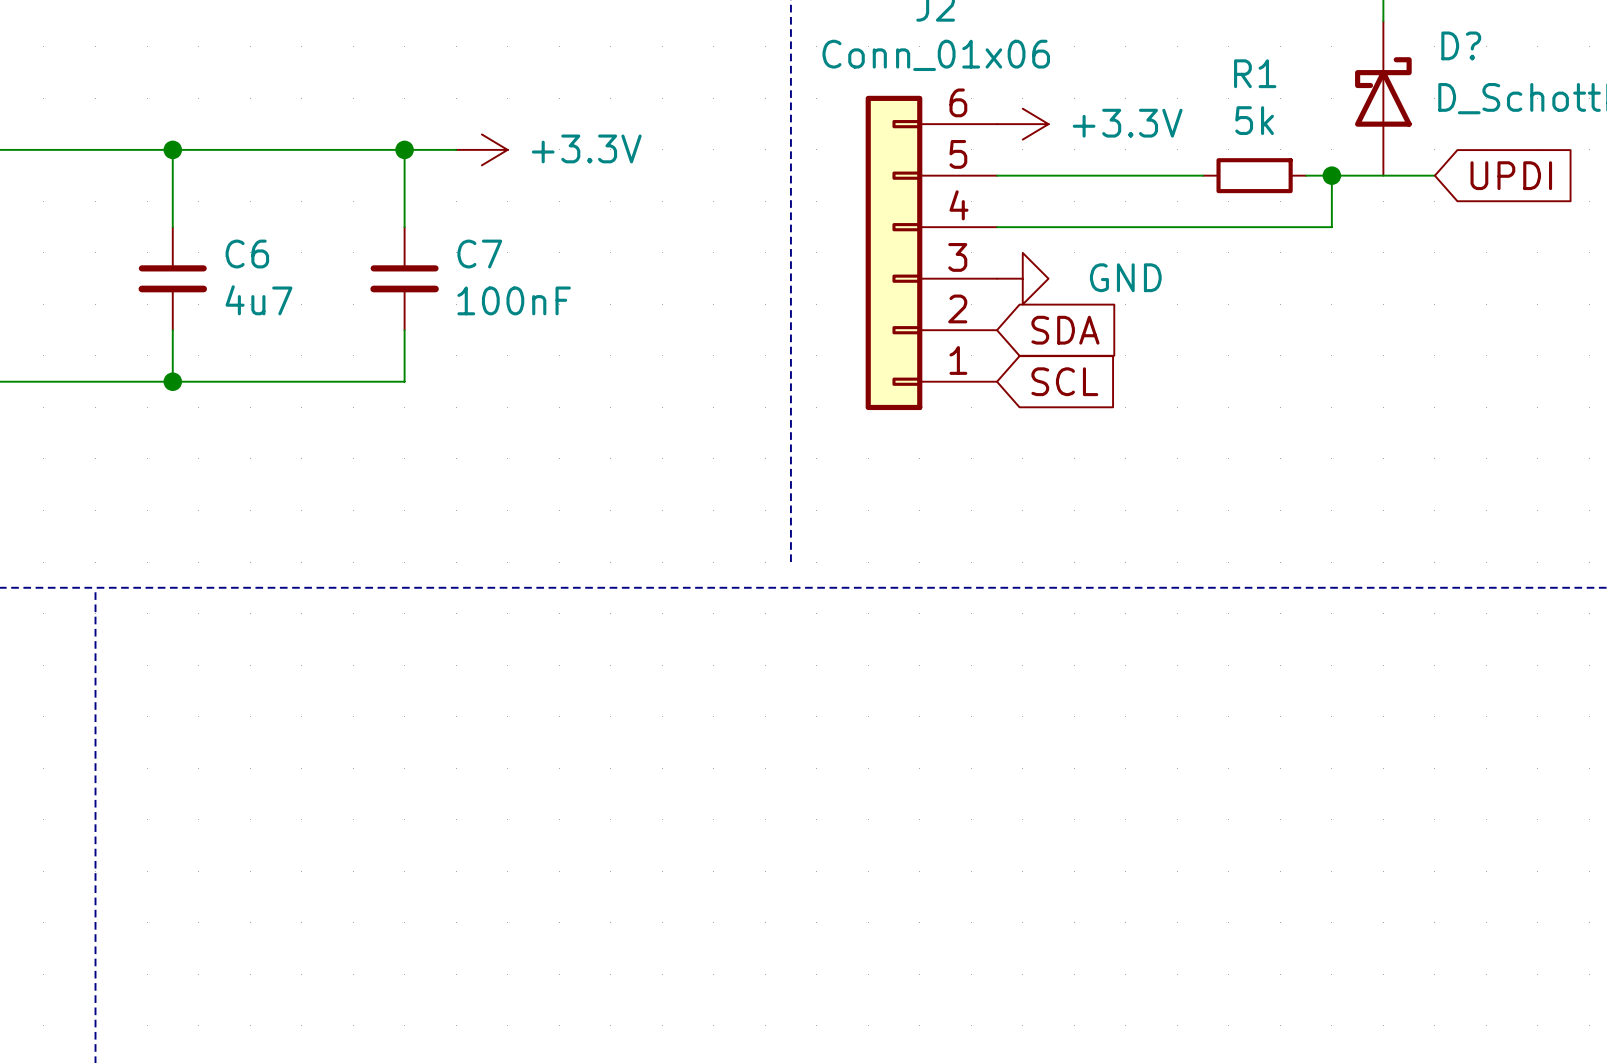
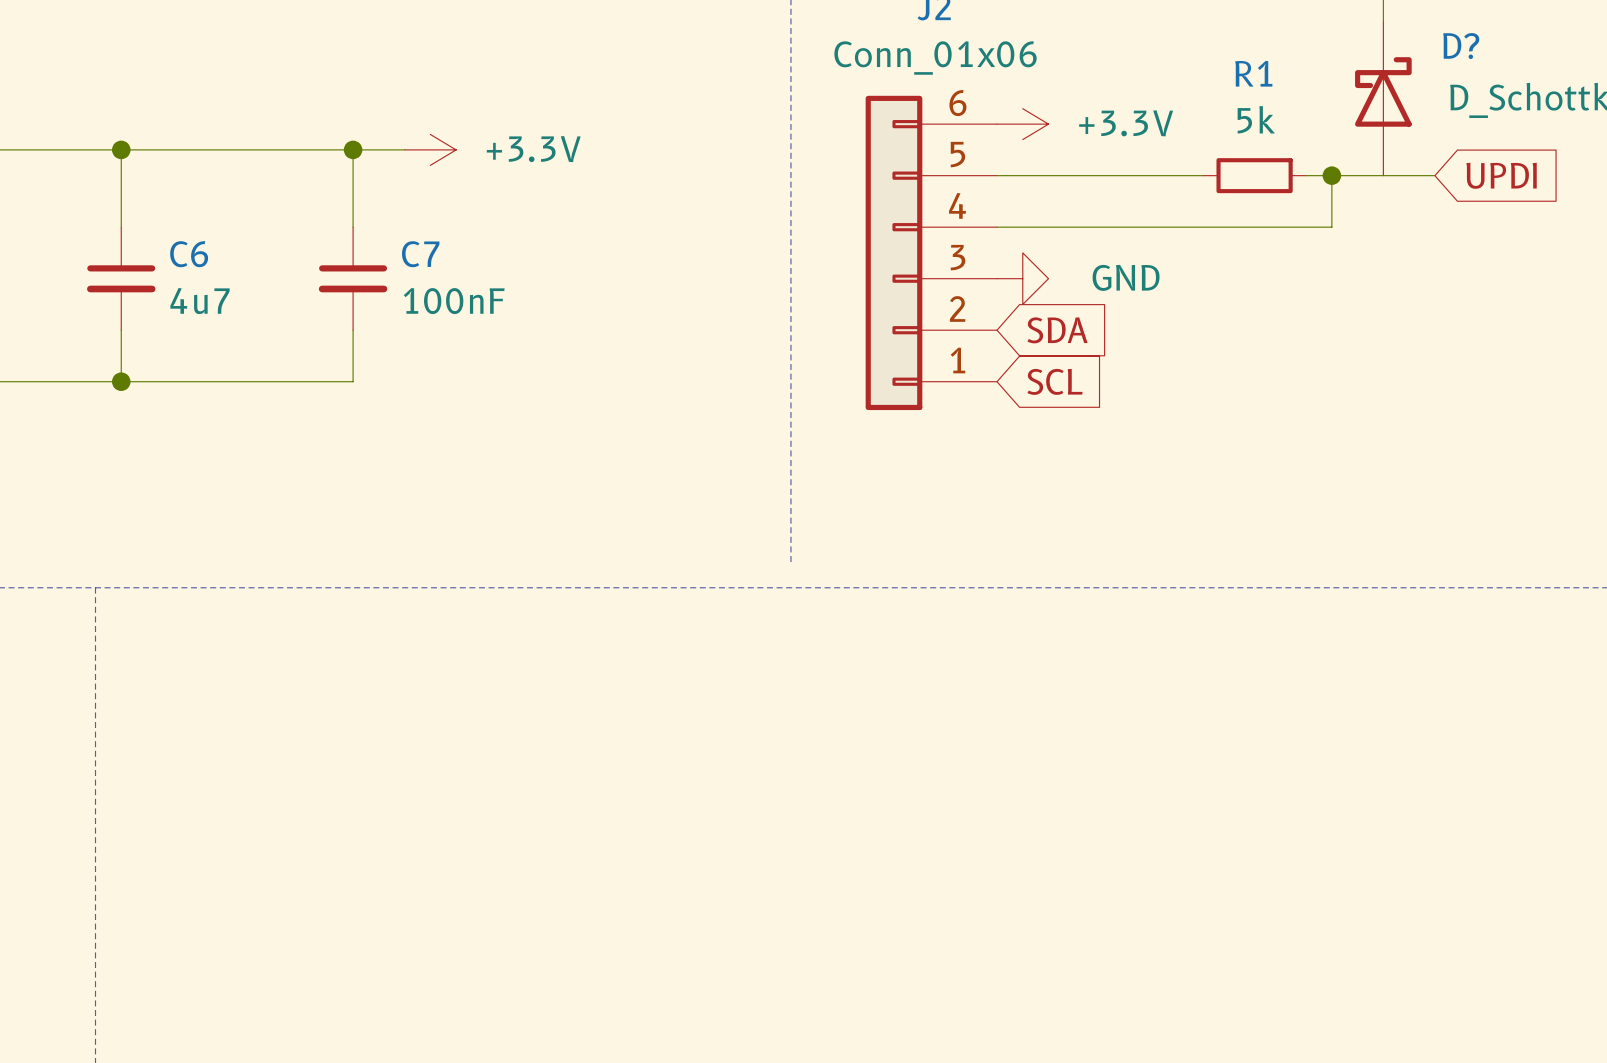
wire: (172, 149) (172, 227) -> (121, 149) (121, 227)
junction position: (172, 149) -> (121, 149)
wire: none -> (353, 149) (353, 227)
junction position: (404, 149) -> (353, 149)
wire: (456, 149) (404, 149) (404, 227) -> none
power symbol position: +3.3V (481, 149) -> +3.3V (430, 149)
C6 position: (172, 278) -> (121, 278)
C7 position: (404, 278) -> (353, 278)
wire: (172, 330) (172, 381) -> (121, 330) (121, 381)
wire: (404, 330) (404, 381) (353, 381) -> (353, 330) (353, 381)
junction position: (172, 381) -> (121, 381)

